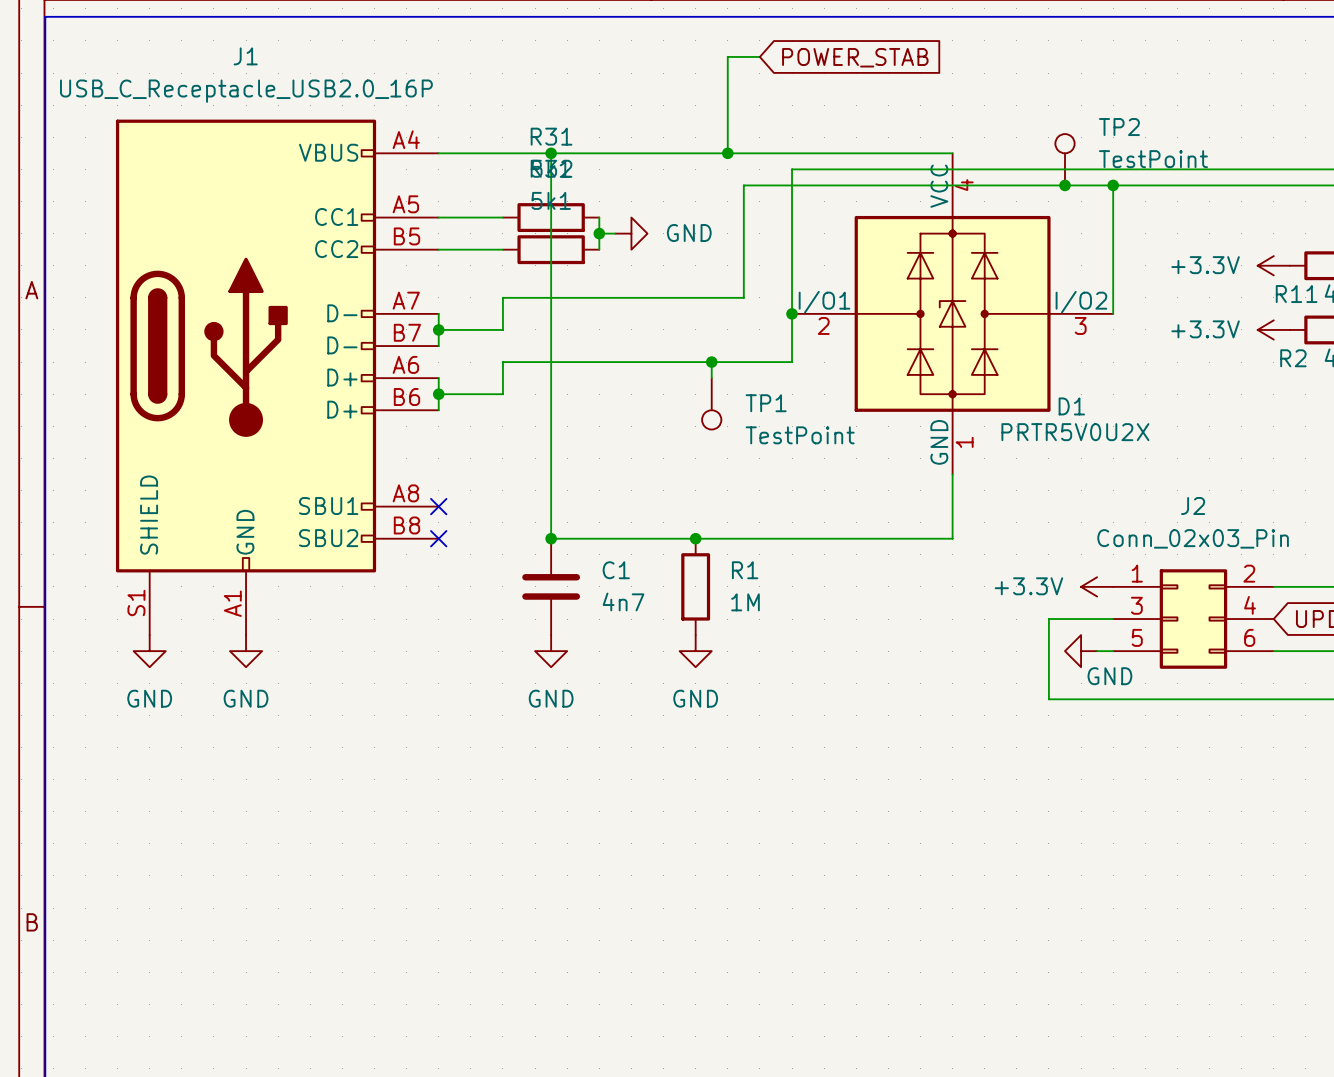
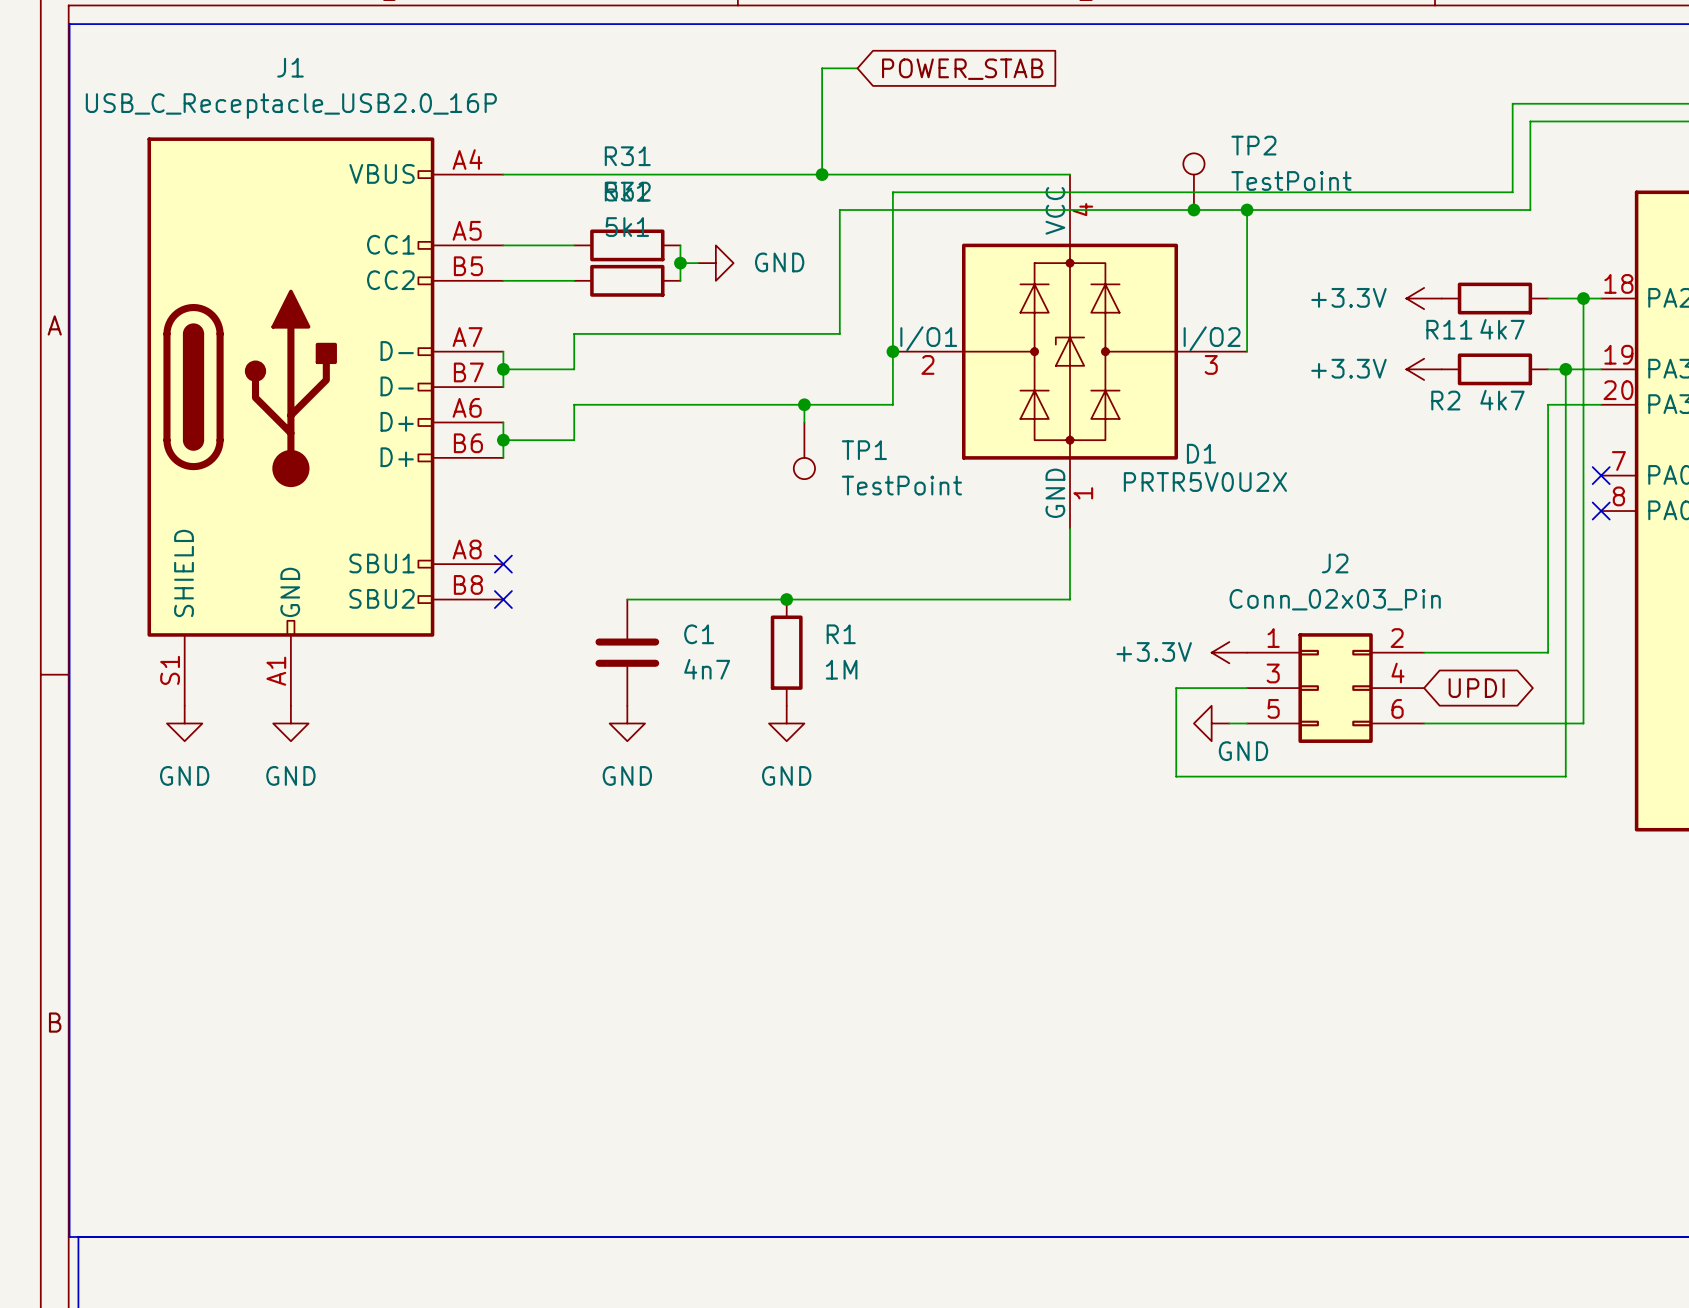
wire: (551, 153) (551, 538) -> none
junction: (551, 153) -> none
junction: (551, 538) -> none

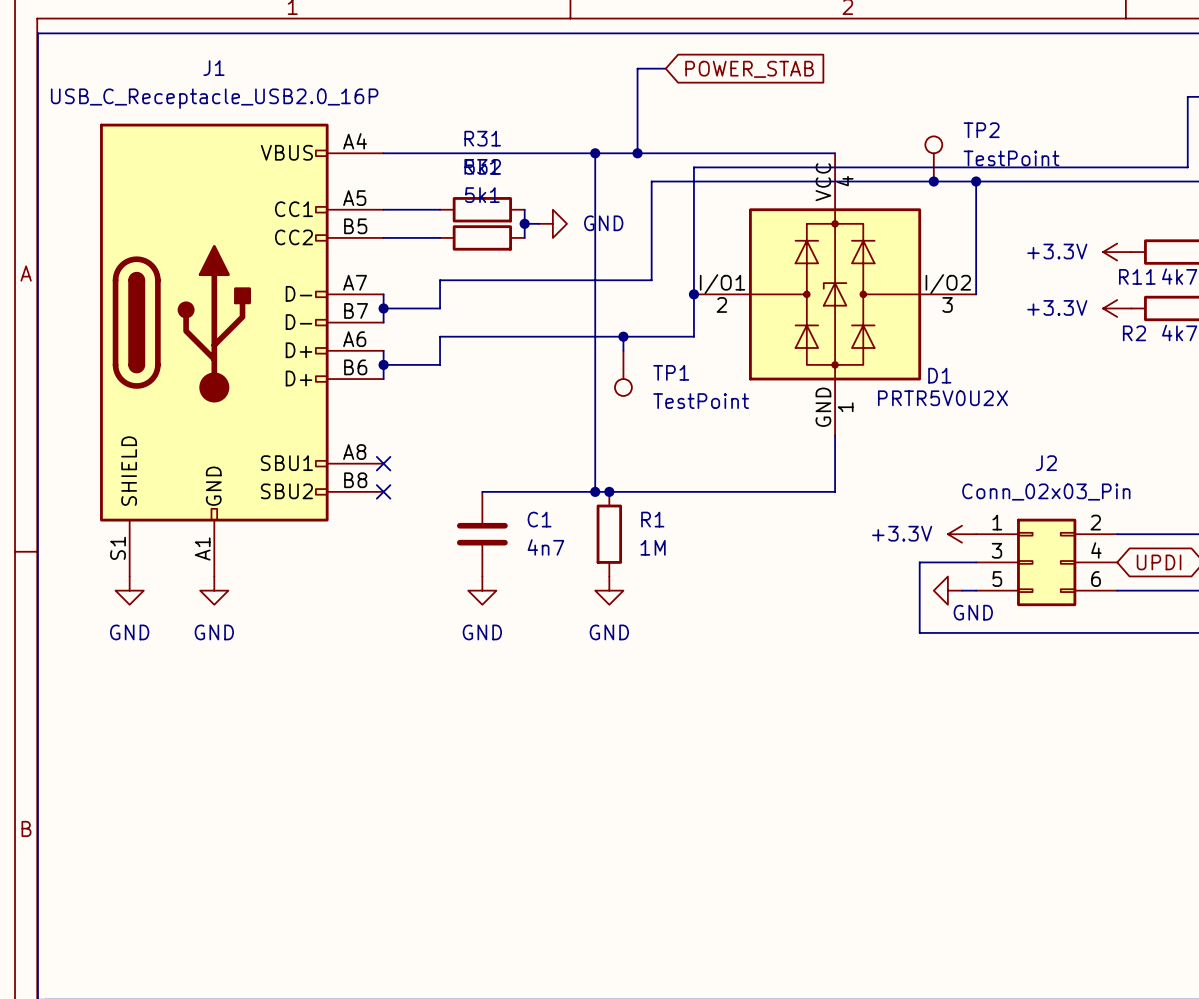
wire: none -> (595, 153) (595, 491)
junction: none -> (595, 153)
junction: none -> (595, 491)

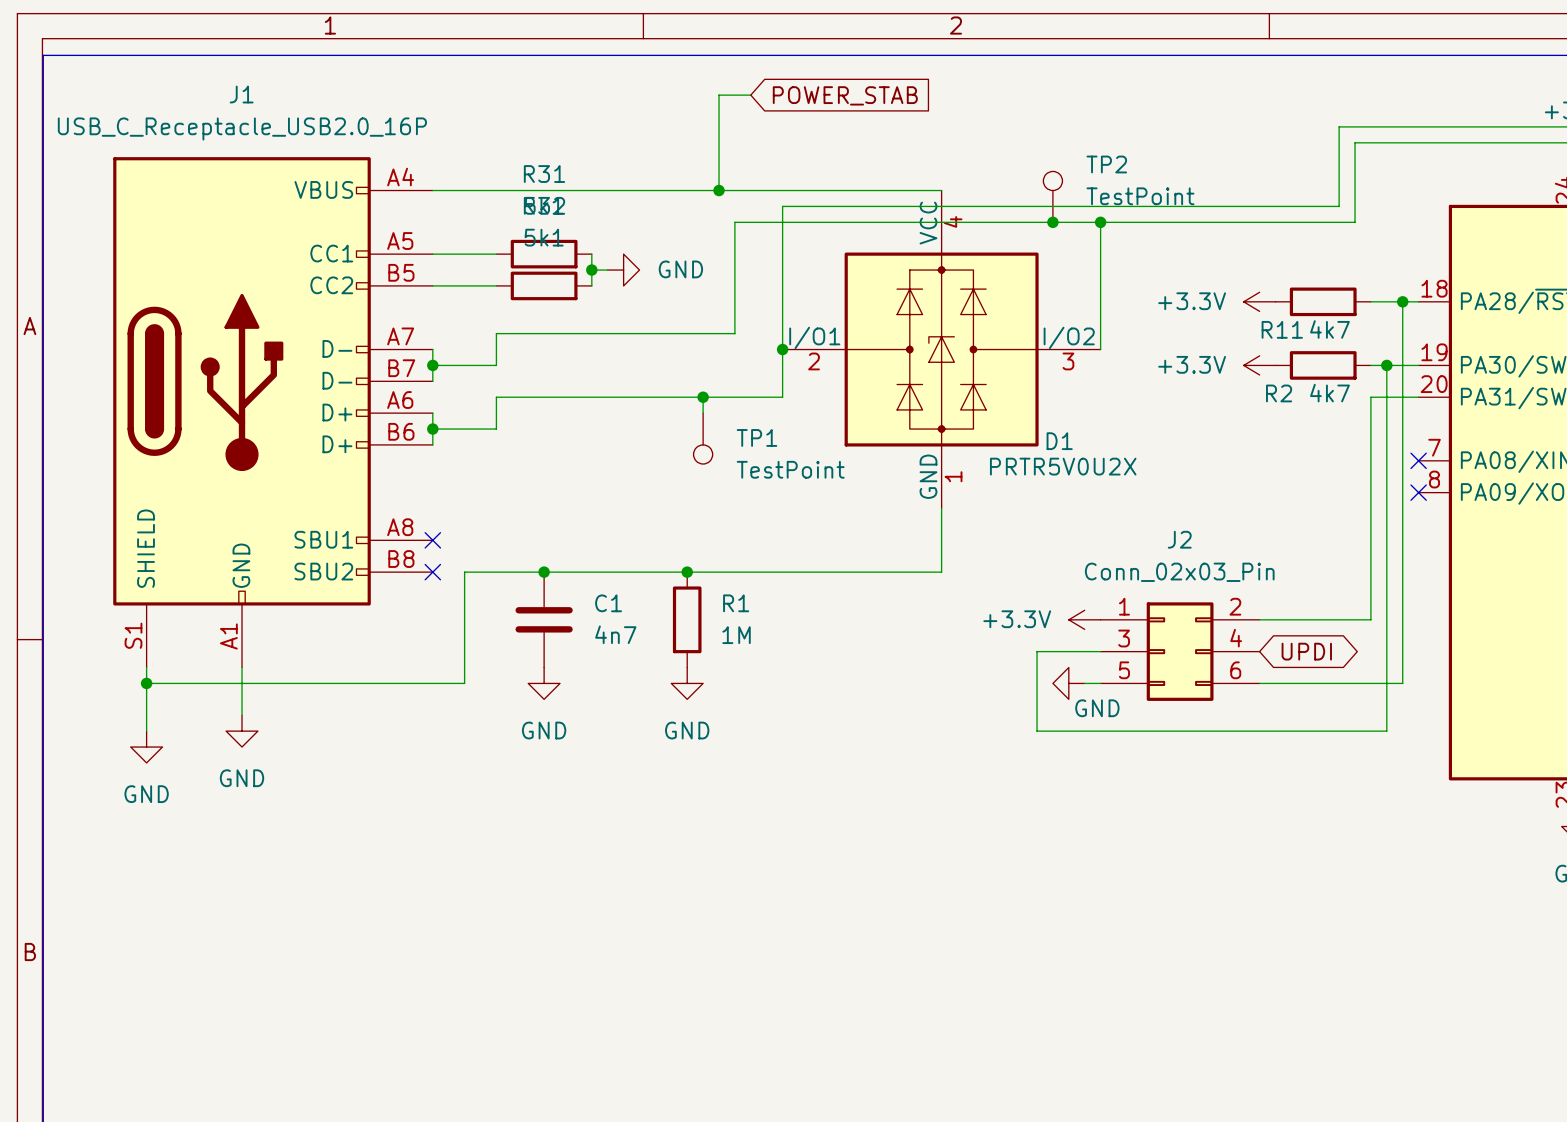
wire: (595, 153) (595, 491) -> none
junction: (595, 153) -> none
wire: none -> (544, 572) (464, 572) (464, 683) (146, 683)
junction: none -> (544, 572)
junction: (595, 491) -> none
wire: none -> (146, 667) (146, 731)
wire: none -> (242, 667) (242, 715)
junction: none -> (146, 683)
power symbol: GND (129, 590) -> none
power symbol position: GND (214, 590) -> GND (242, 731)
power symbol: none -> GND (146, 747)

